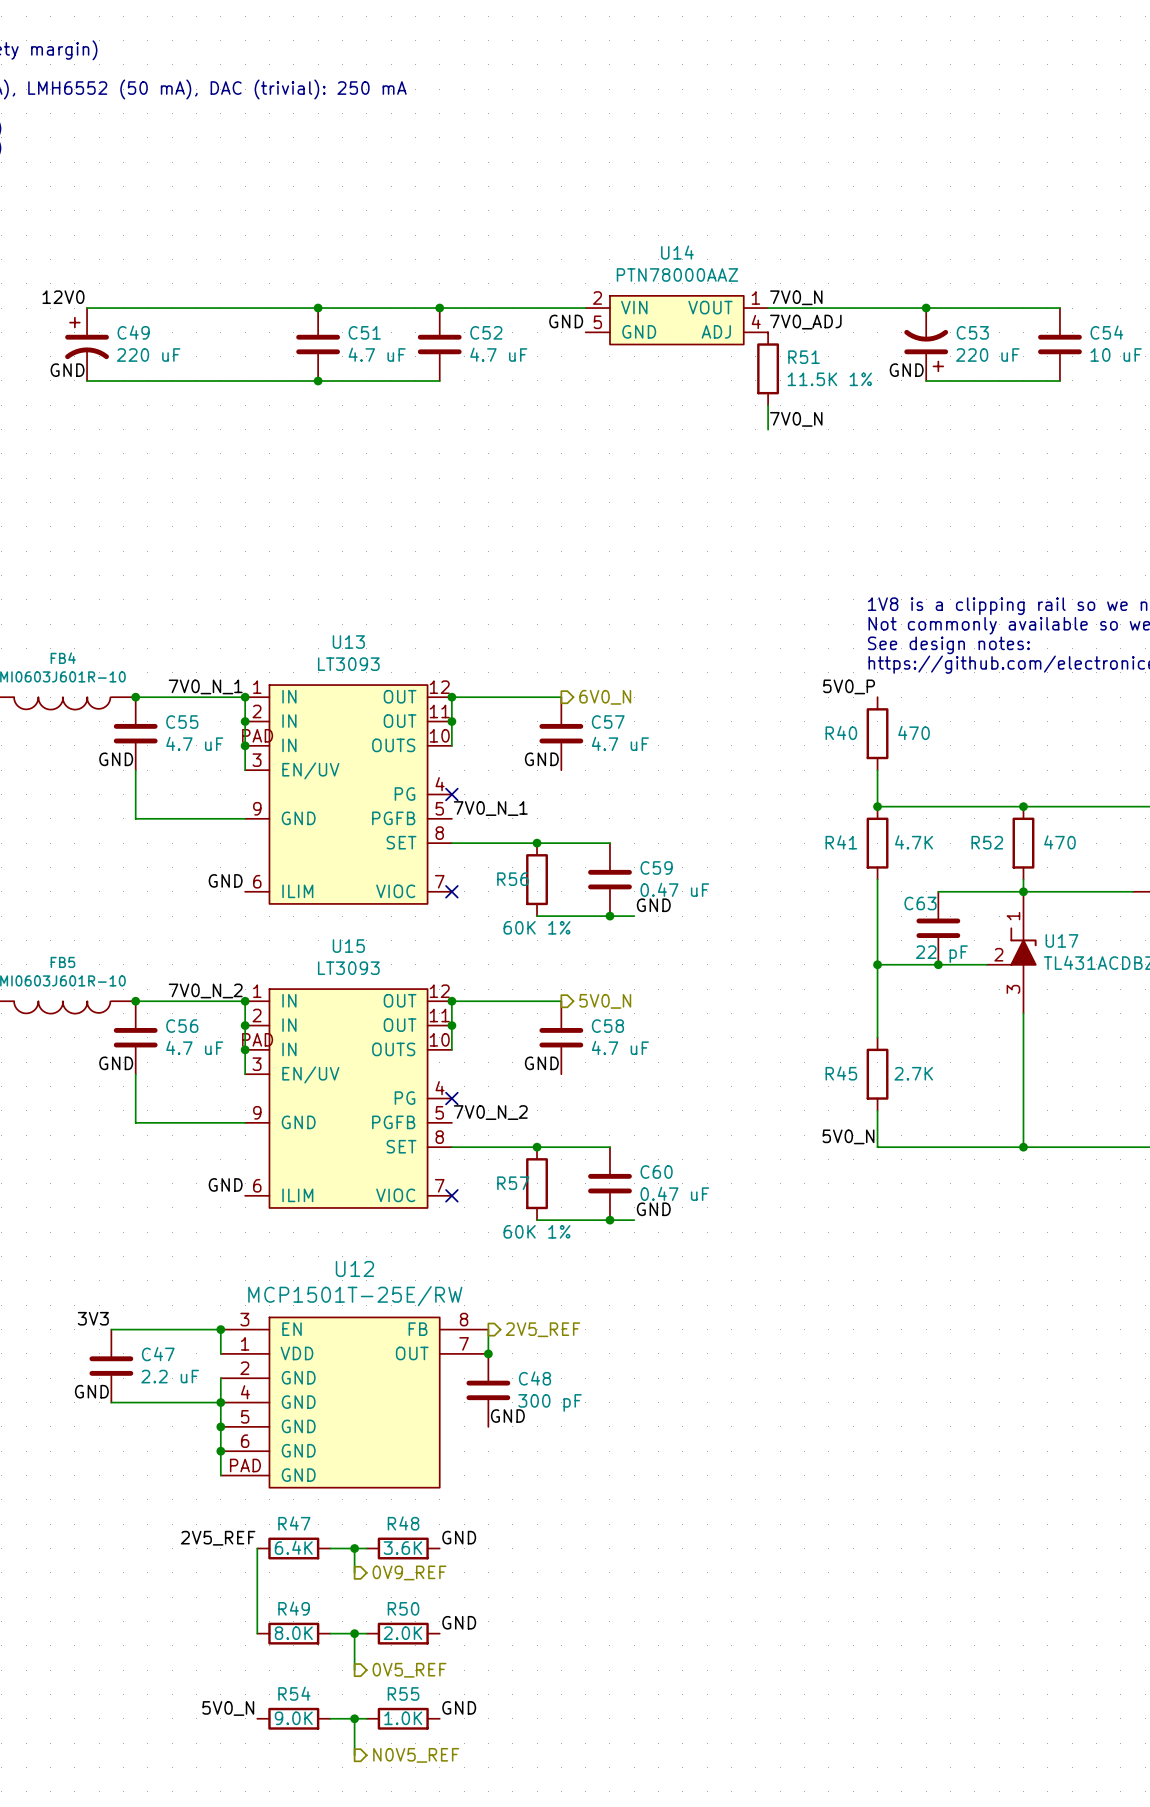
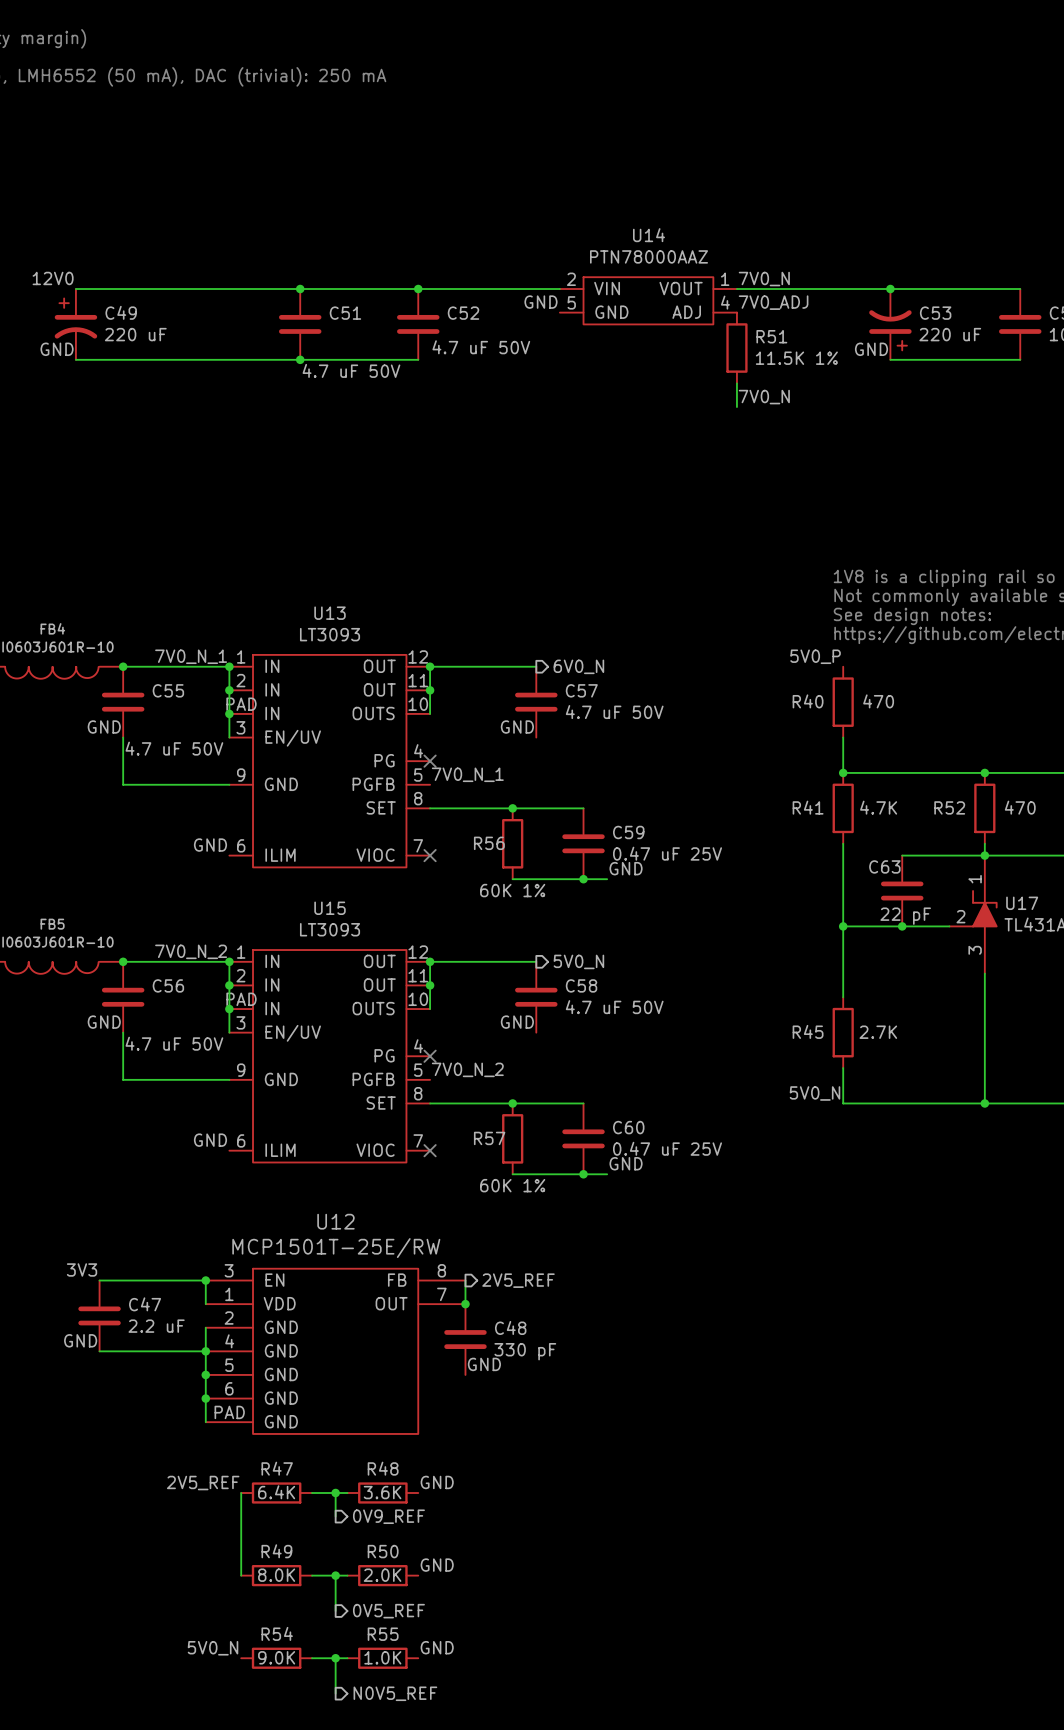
C51 value: 4.7 uF (377, 354) -> 4.7 uF 50V (351, 370)
C52 value: 4.7 uF (498, 354) -> 4.7 uF 50V (481, 347)
C55 value: 4.7 uF (194, 743) -> 4.7 uF 50V (174, 748)
C57 value: 4.7 uF (620, 743) -> 4.7 uF 50V (614, 712)
C59 value: 0.47 uF (674, 889) -> 0.47 uF 25V (667, 853)
C56 value: 4.7 uF (194, 1047) -> 4.7 uF 50V (174, 1043)
C58 value: 4.7 uF (620, 1047) -> 4.7 uF 50V (614, 1007)
C60 value: 0.47 uF (674, 1193) -> 0.47 uF 25V (667, 1148)
C48 value: 300 pF (550, 1402) -> 330 pF (525, 1351)

